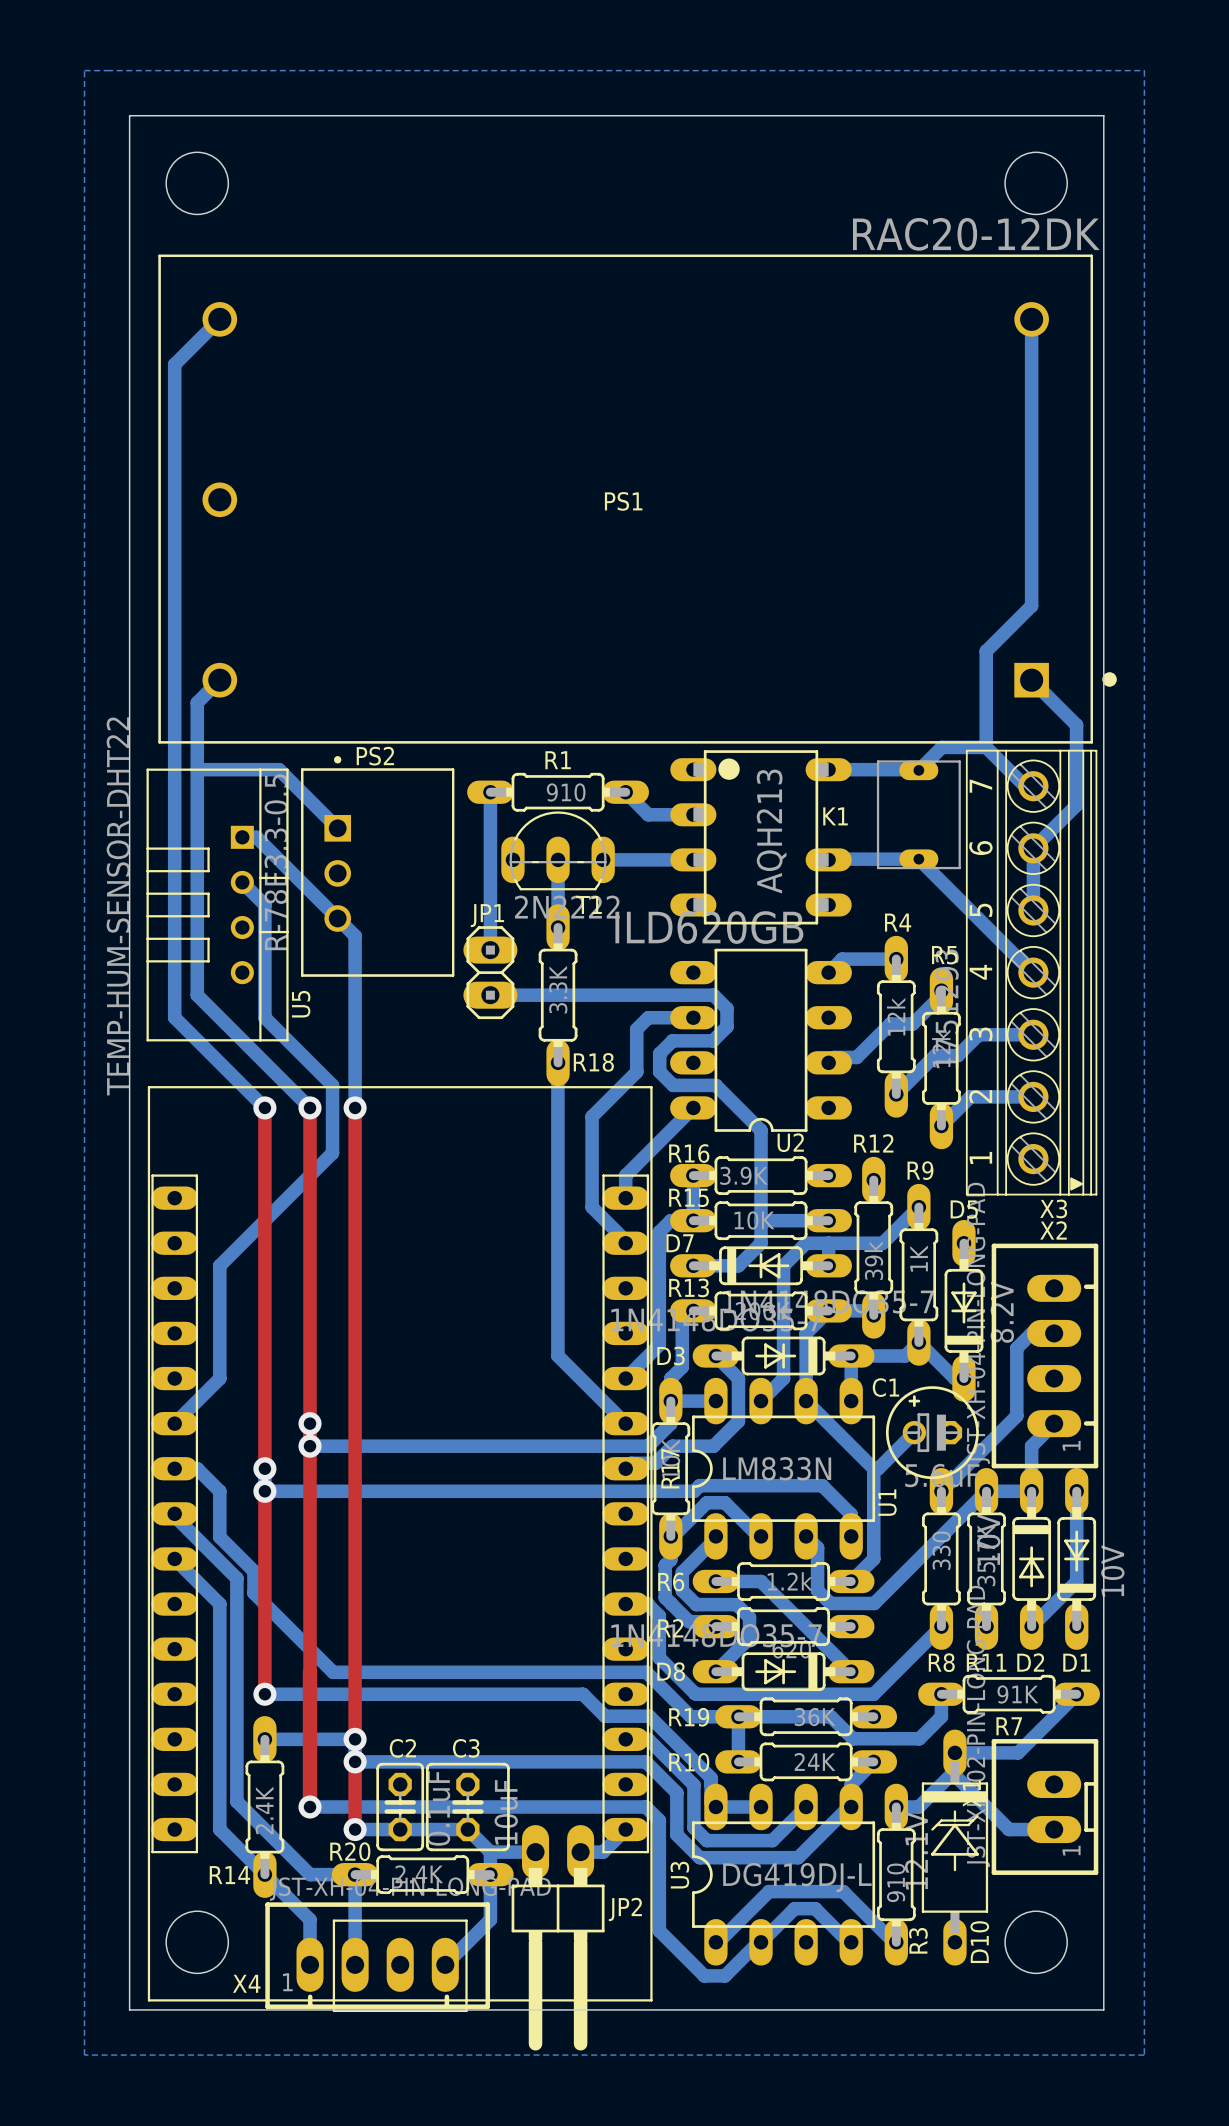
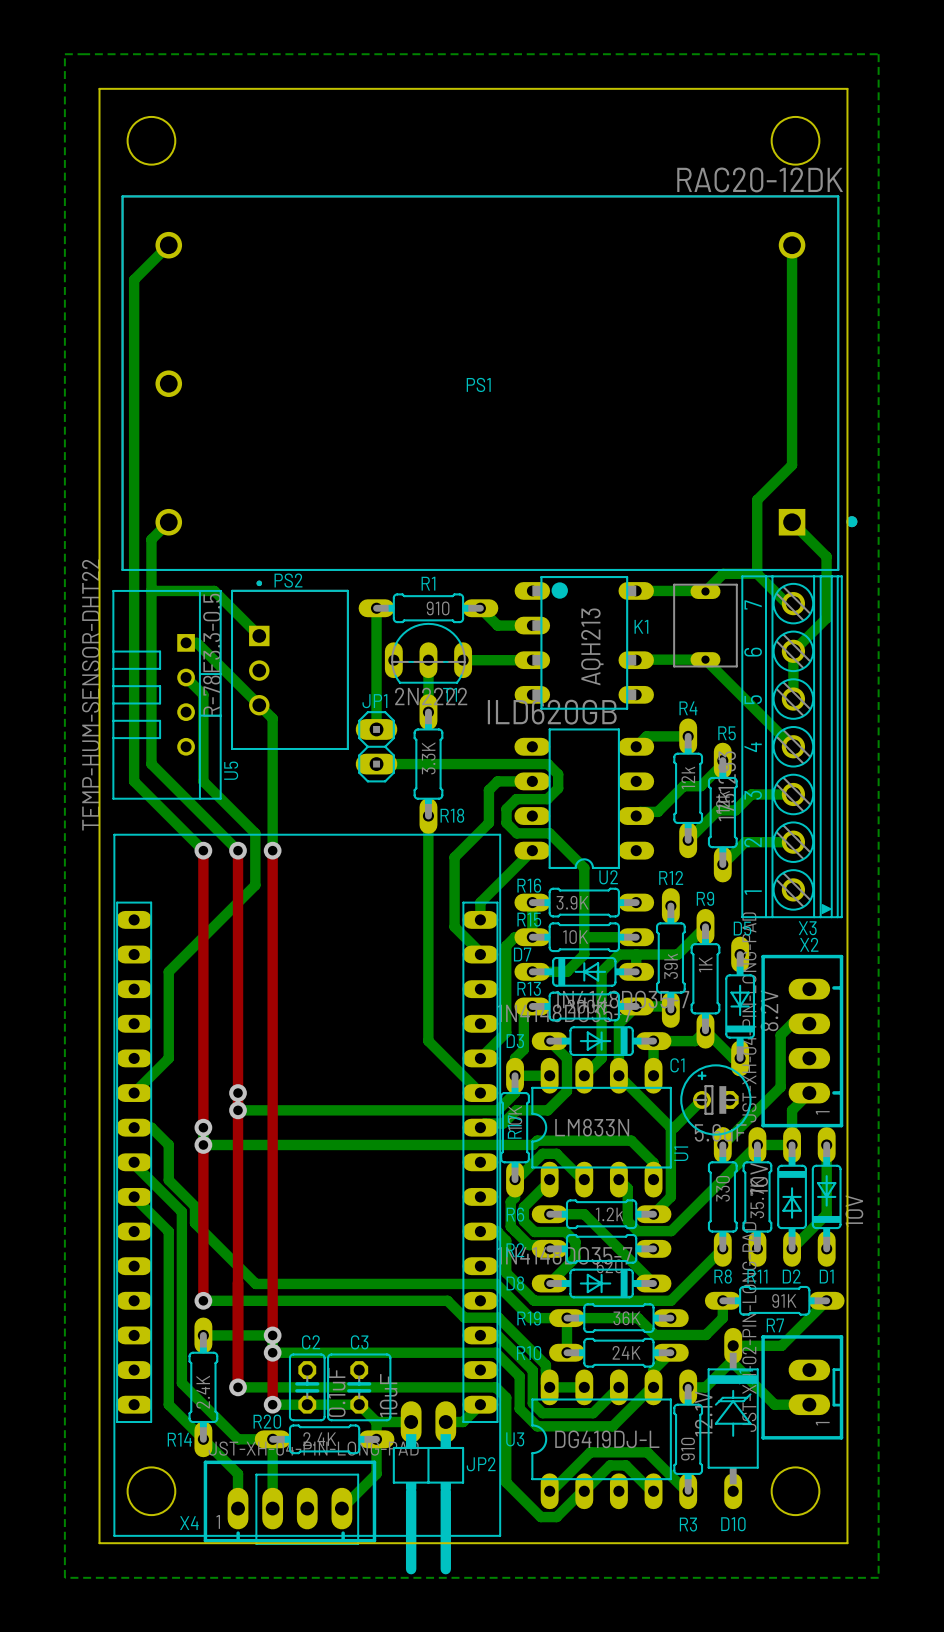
U3 name rotation: 0° (679, 1875) -> 90° clockwise (515, 1439)
R3 name rotation: 0° (918, 1940) -> 90° clockwise (688, 1524)
R3 name position: R3 (918, 1940) -> R3 (688, 1524)
D10 name rotation: 0° (979, 1942) -> 90° clockwise (733, 1524)

